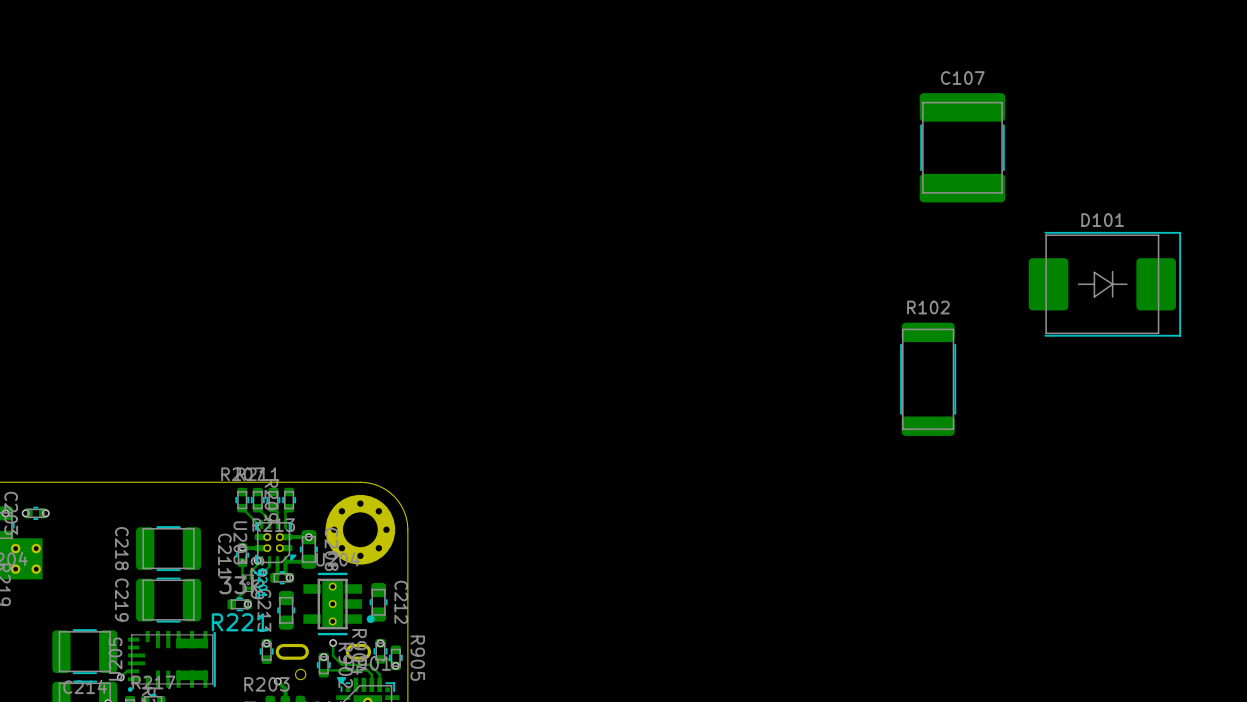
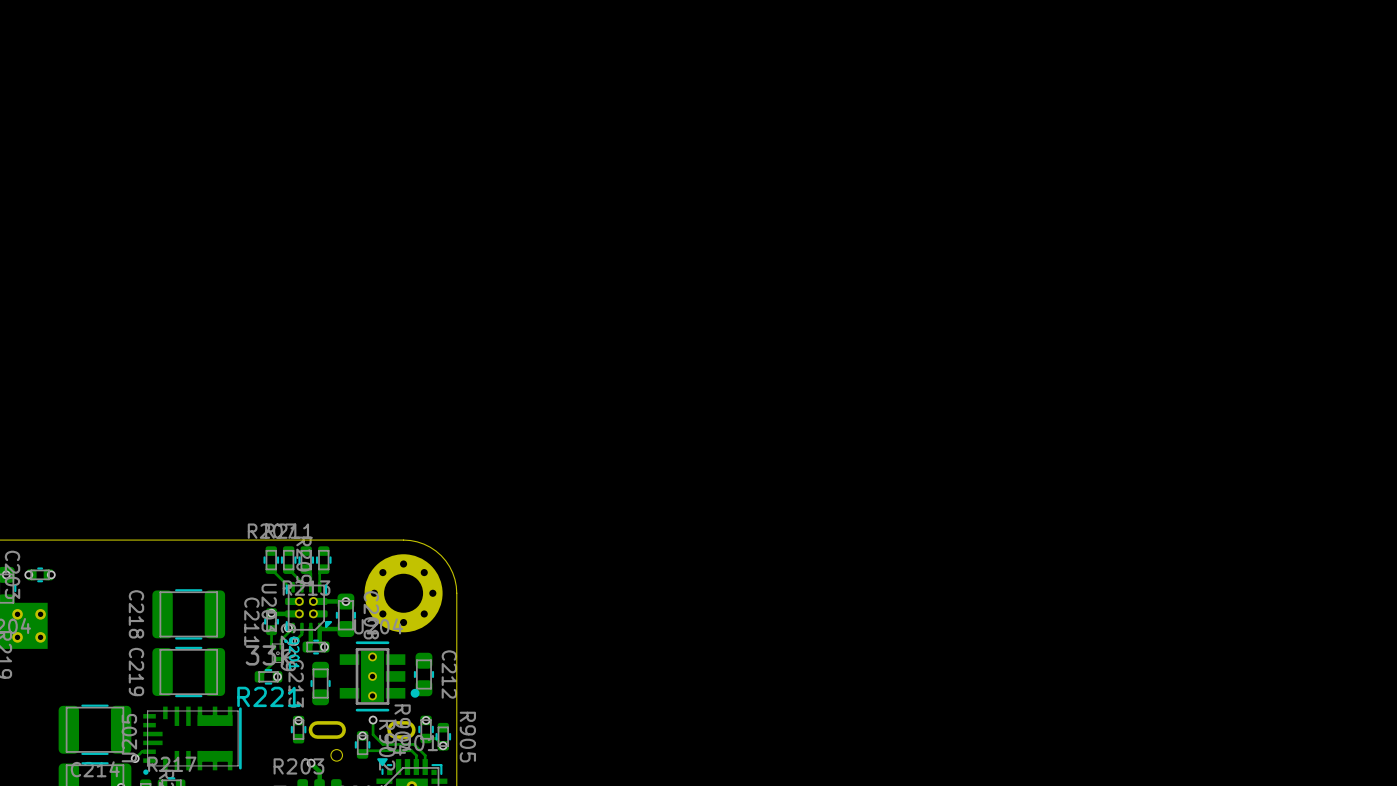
C107: (962, 147) -> none
D101: (1104, 284) -> none
R102: (928, 379) -> none

